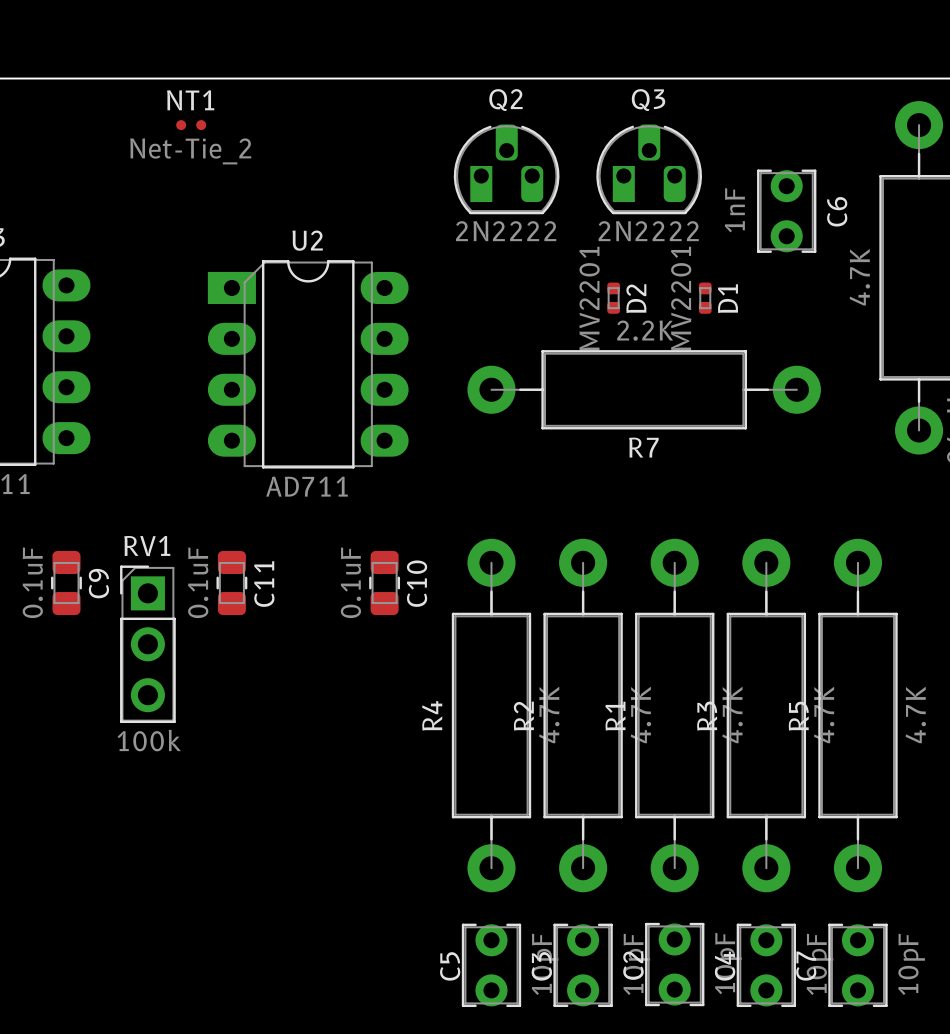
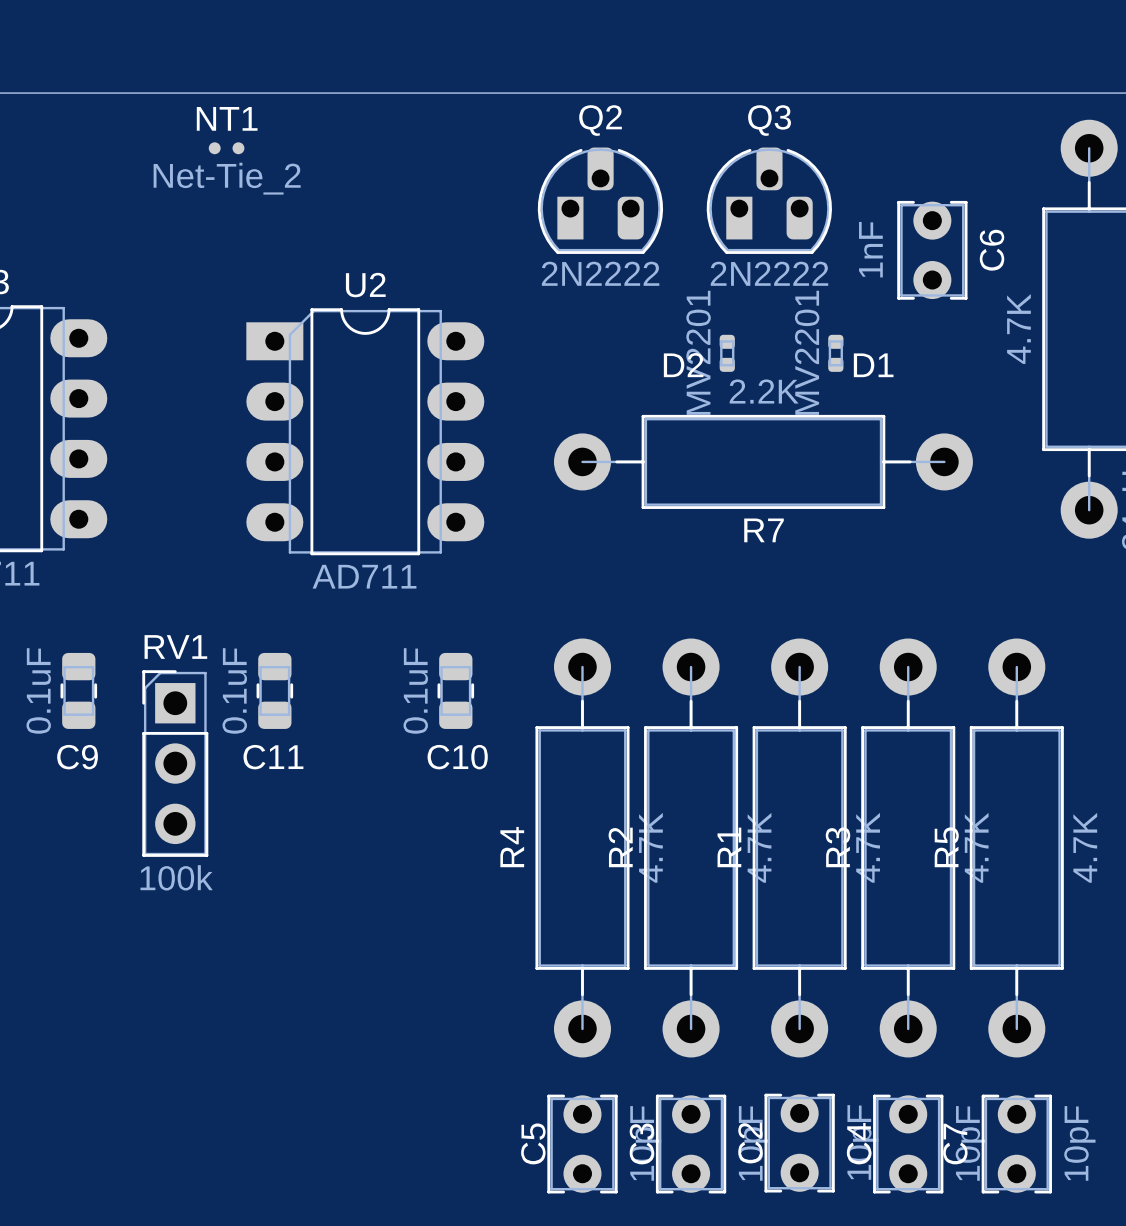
D2 name rotation: 0° (636, 298) -> 90° clockwise (683, 365)
D2 name position: D2 (636, 298) -> D2 (683, 365)
D1 name rotation: 0° (727, 298) -> 90° clockwise (873, 365)
C9 name rotation: 0° (98, 583) -> 90° clockwise (77, 757)
C9 name position: C9 (98, 583) -> C9 (77, 757)
C10 name rotation: 0° (417, 583) -> 90° clockwise (457, 757)
C11 name rotation: 0° (264, 584) -> 90° clockwise (273, 757)

